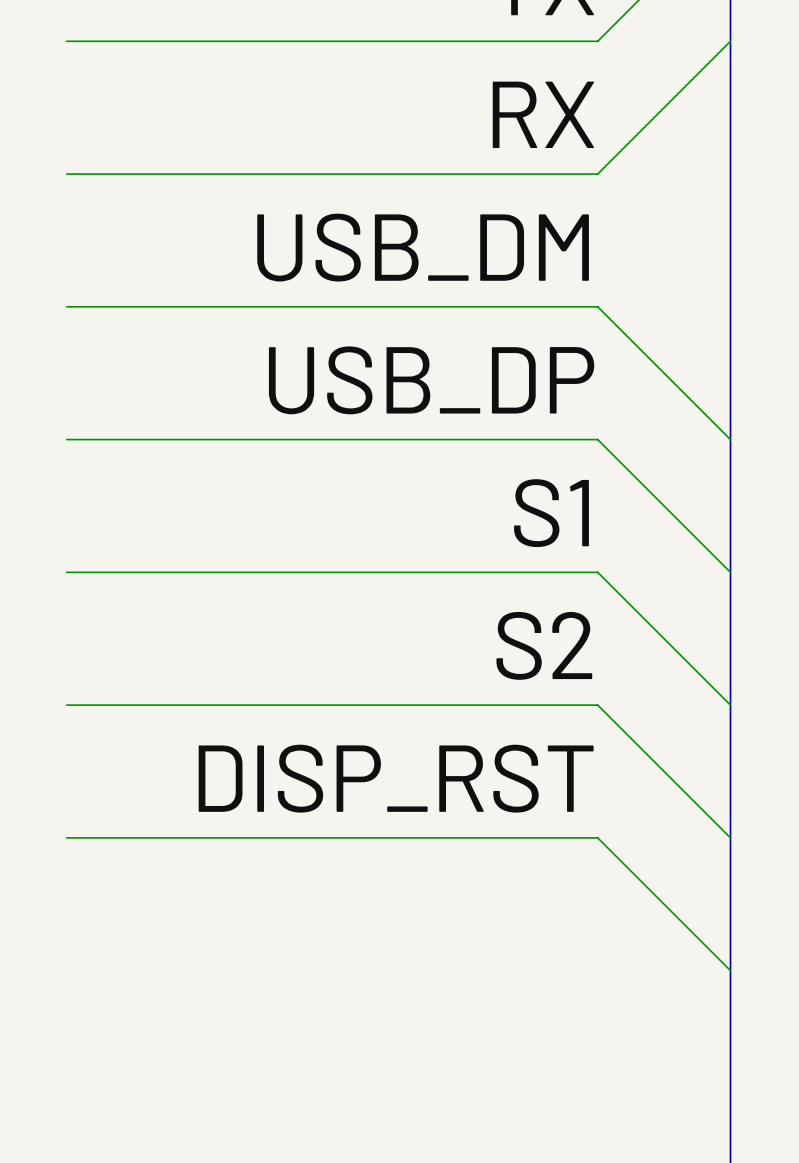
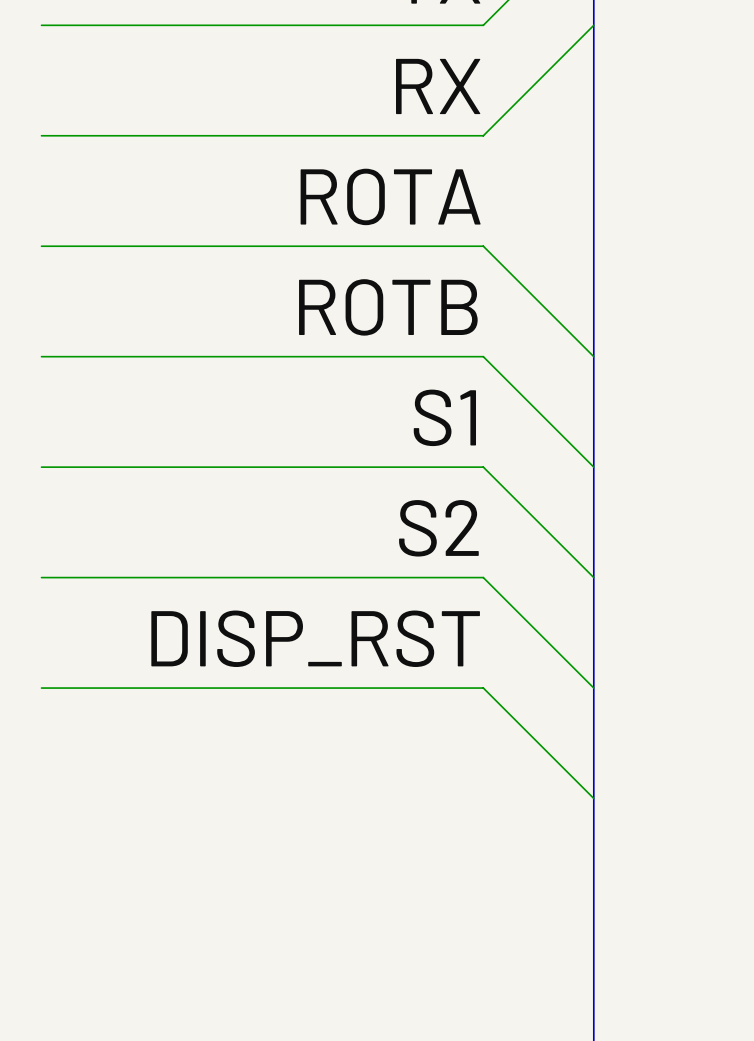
label: USB_DM (423, 247) -> ROTA (390, 196)
label: USB_DP (431, 380) -> ROTB (388, 307)

